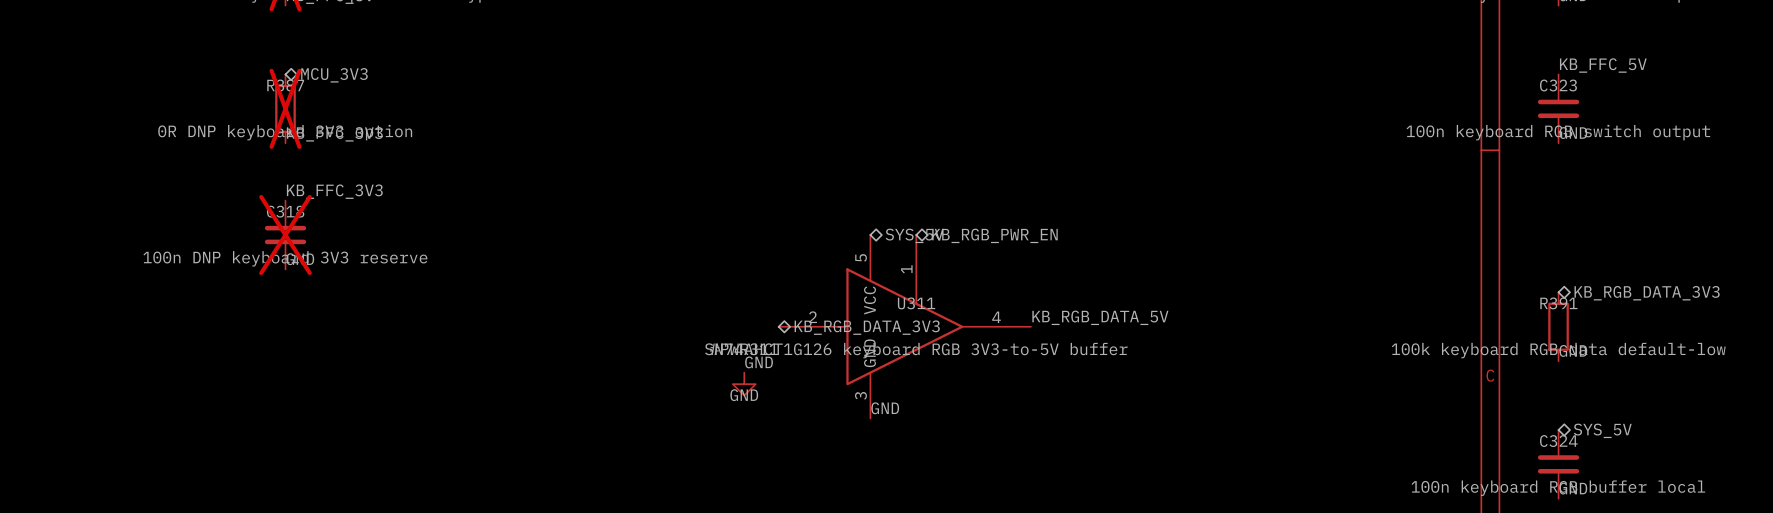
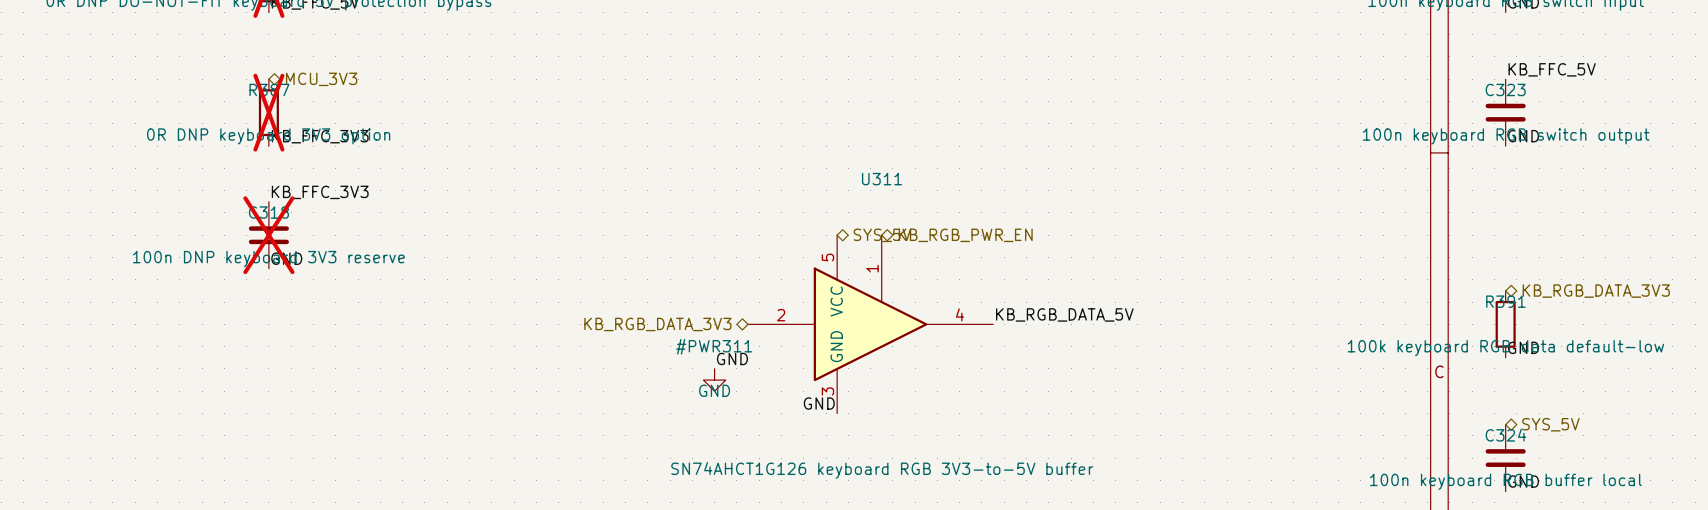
U311 name position: U311 (916, 303) -> U311 (881, 179)
hierarchical label rotation: 0° (867, 327) -> 180° (657, 324)
hierarchical label position: KB_RGB_DATA_3V3 (867, 327) -> KB_RGB_DATA_3V3 (657, 324)
U311 value position: SN74AHCT1G126 keyboard RGB 3V3-to-5V buffer (916, 350) -> SN74AHCT1G126 keyboard RGB 3V3-to-5V buffer (882, 470)
label position: GND (885, 408) -> GND (819, 403)

